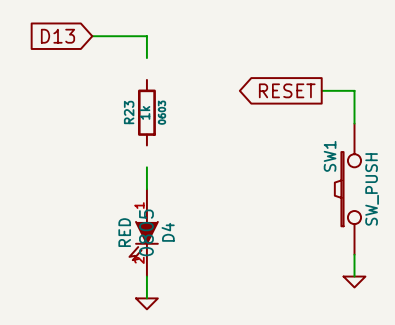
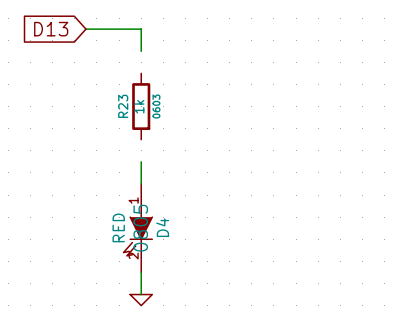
global label: RESET (287, 90) -> none
wire: (321, 90) (354, 90) (354, 123) -> none
SW1: SW_PUSH (347, 189) -> none
wire: (354, 254) (354, 276) -> none
power symbol: (354, 282) -> none

